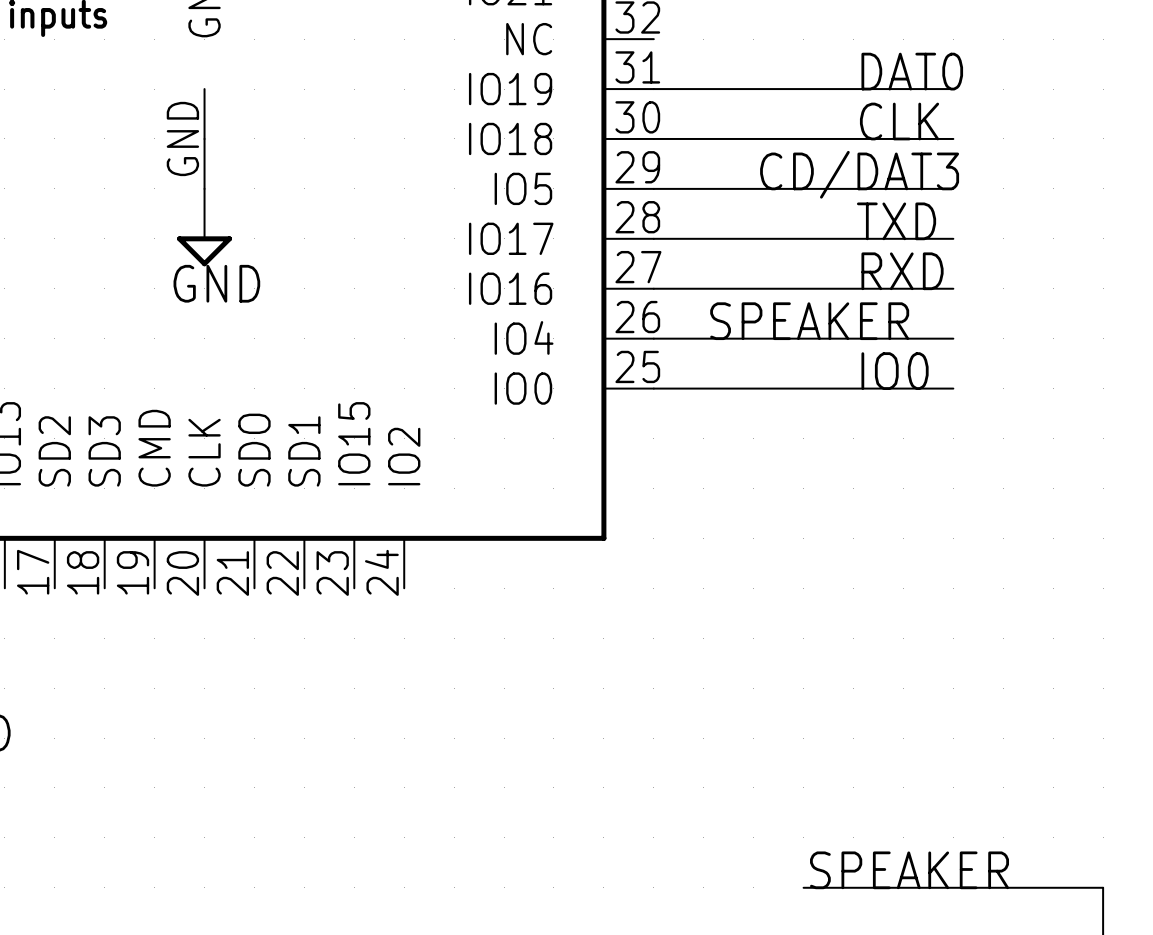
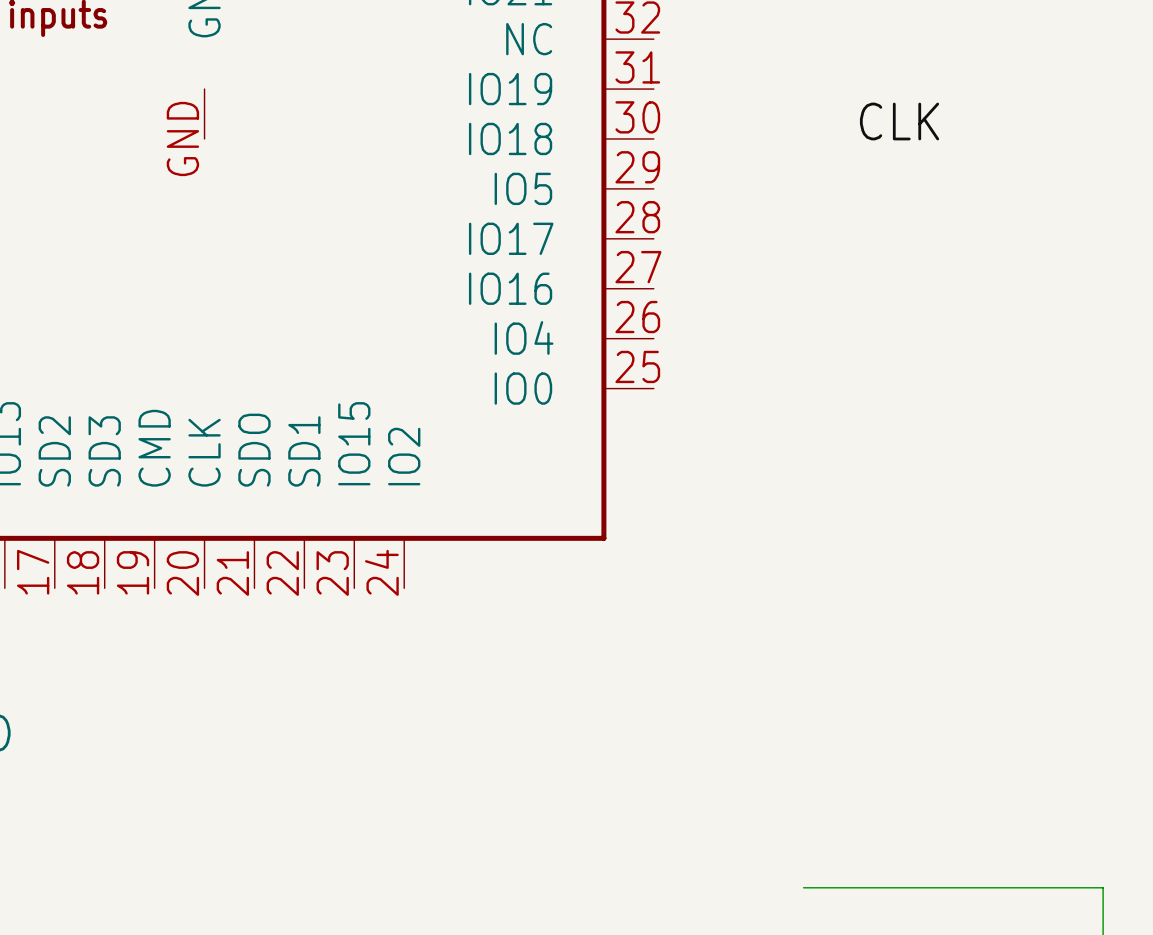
label: DAT0 (912, 71) -> none
wire: (653, 89) (953, 89) -> none
wire: (204, 138) (204, 188) -> none
wire: (653, 138) (953, 138) -> none
label: CD/DAT3 (859, 174) -> none
wire: (653, 188) (953, 188) -> none
label: TXD (896, 221) -> none
power symbol: GND (204, 227) -> none
wire: (653, 238) (953, 238) -> none
label: RXD (902, 271) -> none
wire: (653, 288) (953, 288) -> none
label: SPEAKER (809, 321) -> none
wire: (653, 338) (953, 338) -> none
label: IO0 (895, 371) -> none
wire: (653, 388) (953, 388) -> none
label: SPEAKER (909, 870) -> none

